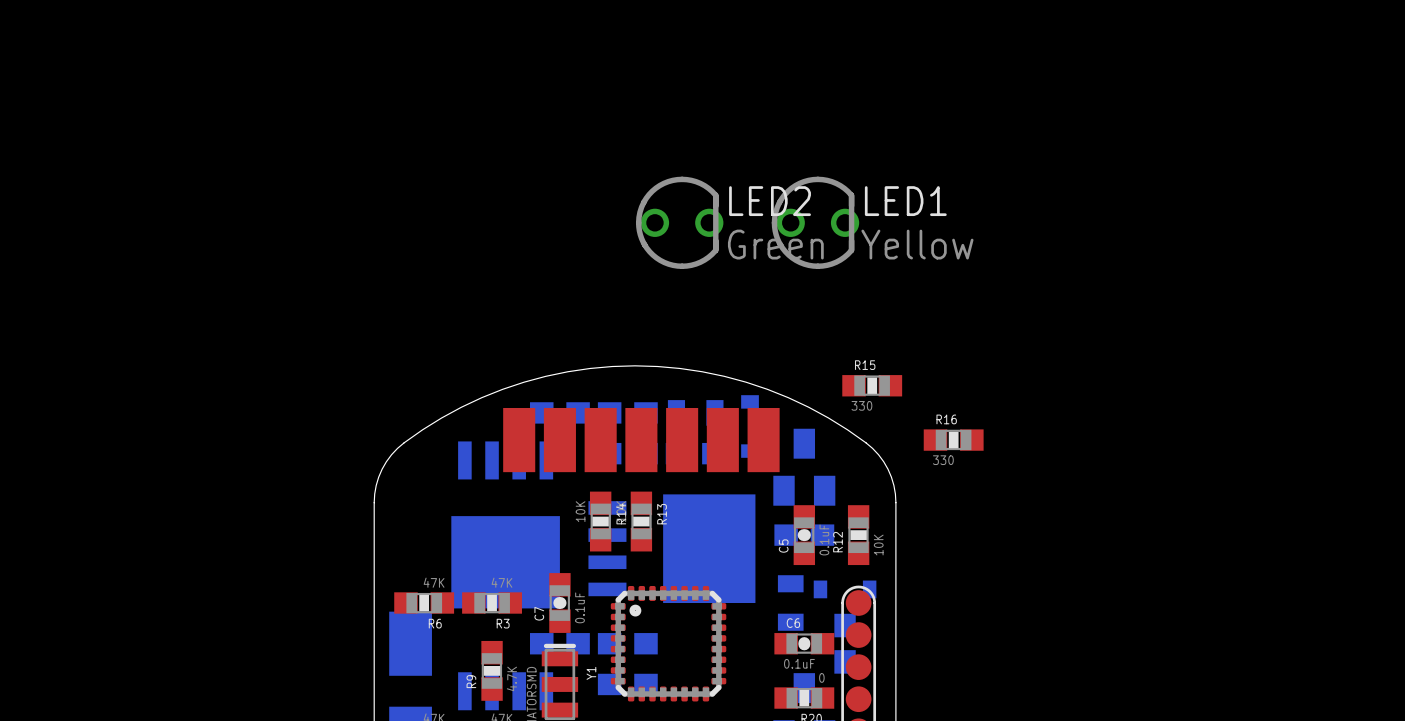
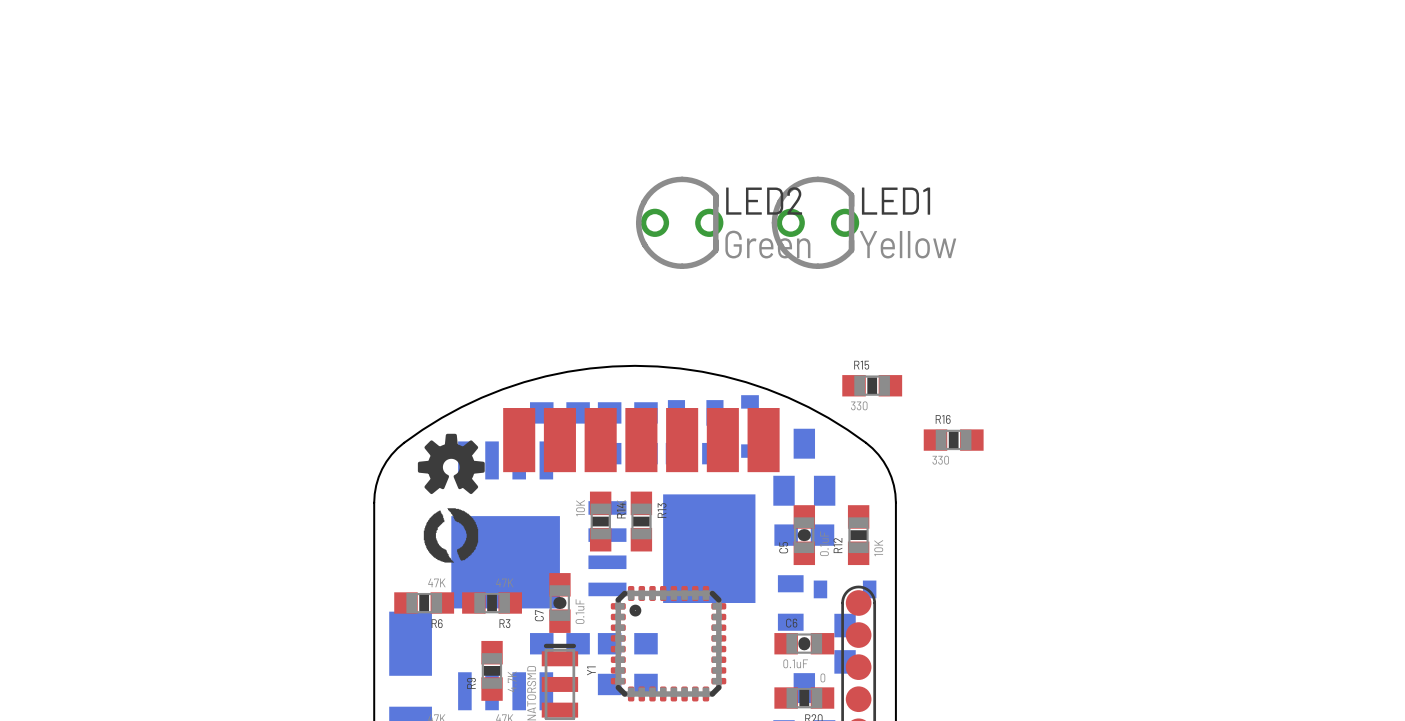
drawing: none -> [417, 433, 485, 563]

